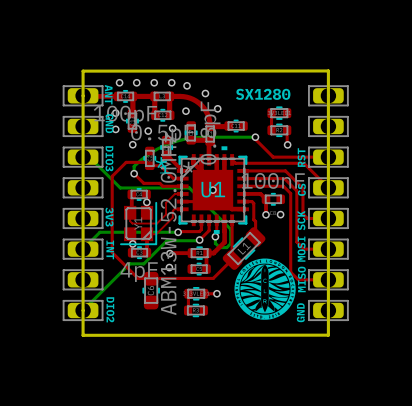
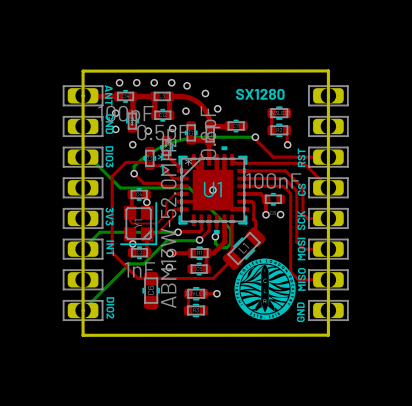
part value: 4pF (139, 272) -> 1nF (139, 269)

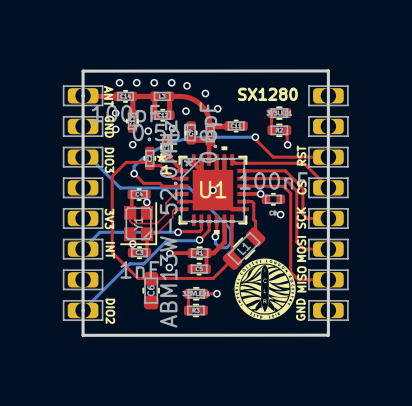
top track: (266, 199) (266, 214) -> none
via position: (266, 214) -> (260, 193)

